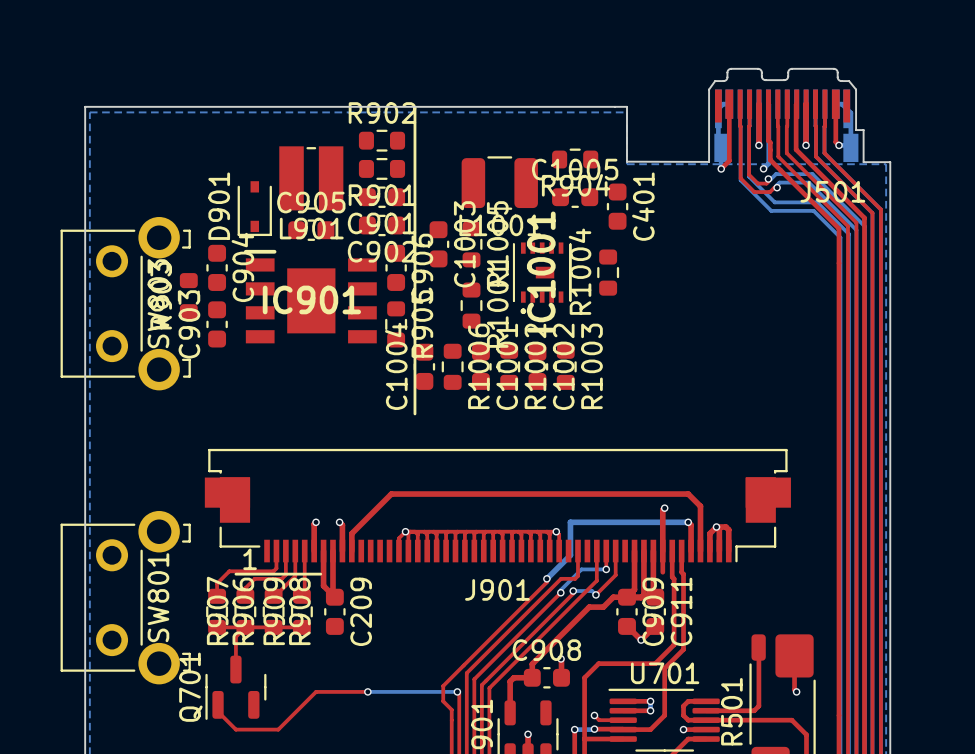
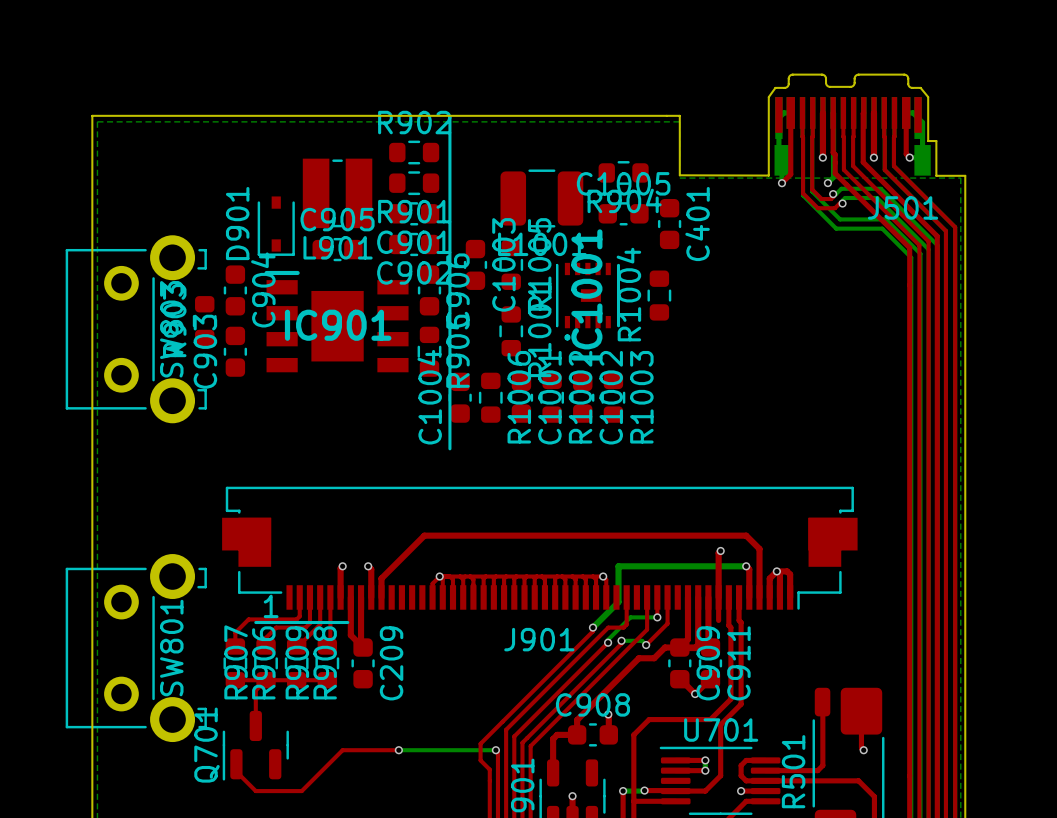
top track: (594, 715) (599, 720) (623, 720) -> none
via: (594, 715) -> none

